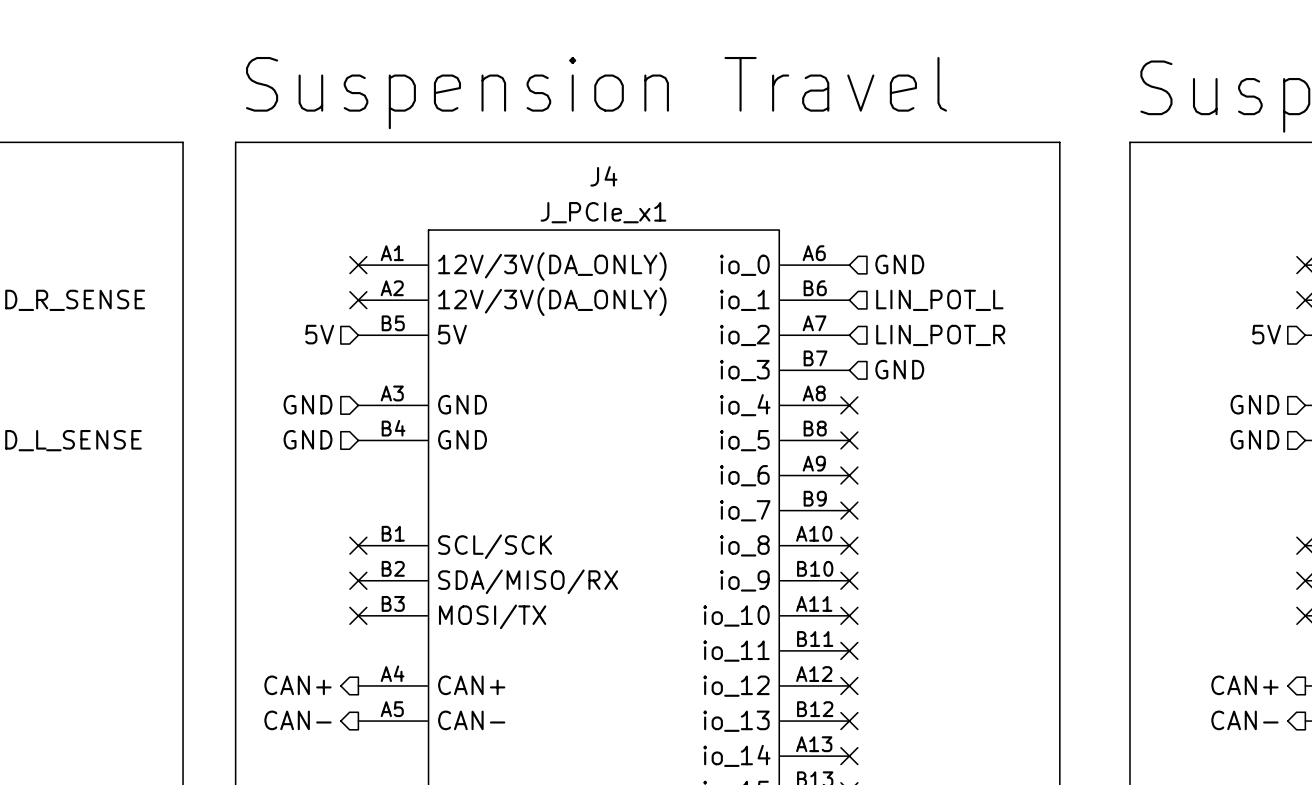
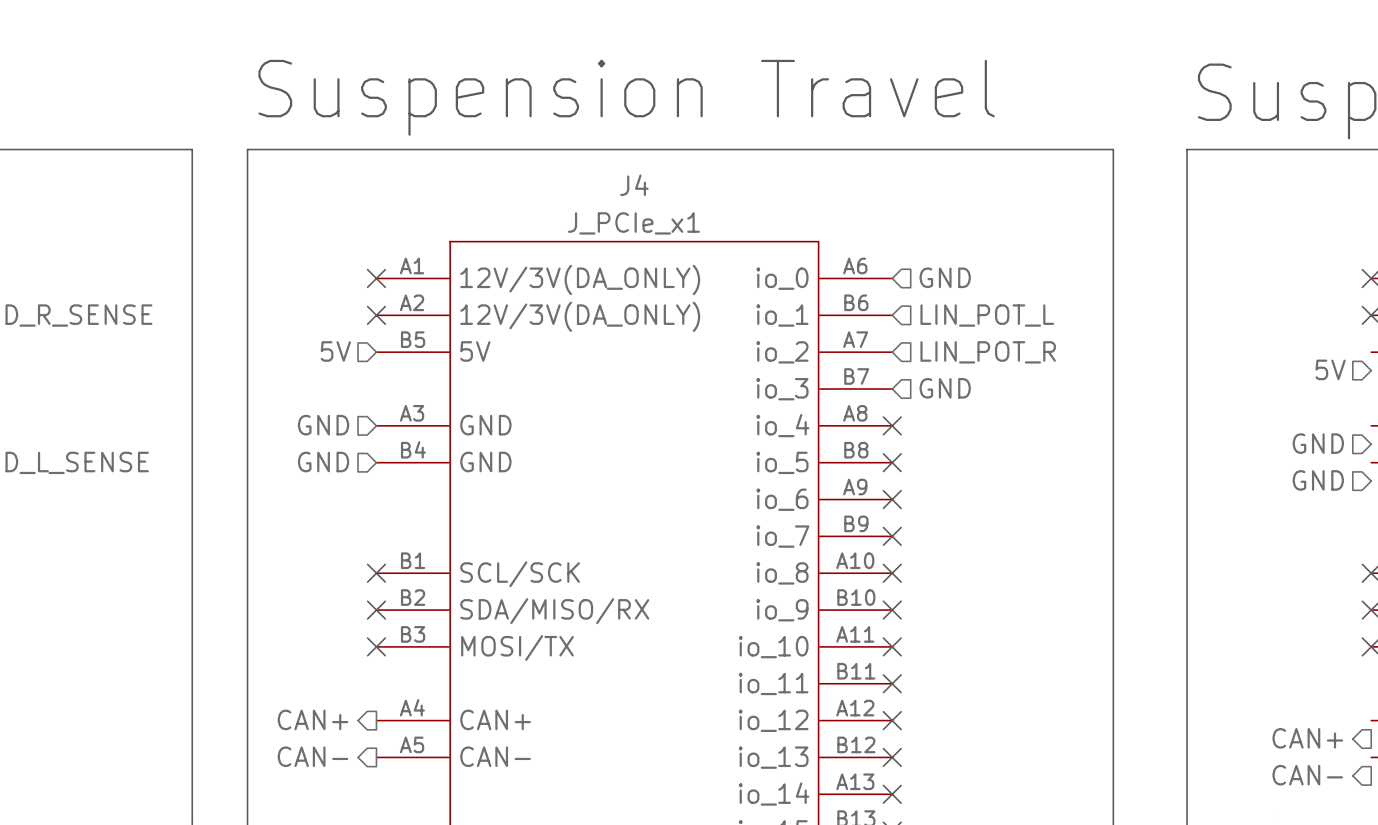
hierarchical label position: 5V (1266, 334) -> 5V (1330, 369)
hierarchical label: GND (1254, 404) -> none
hierarchical label: none -> GND (1318, 443)
hierarchical label: GND (1254, 439) -> none
hierarchical label: none -> GND (1318, 480)
hierarchical label position: CAN+ (1244, 685) -> CAN+ (1307, 738)
hierarchical label position: CAN- (1244, 720) -> CAN- (1307, 775)

